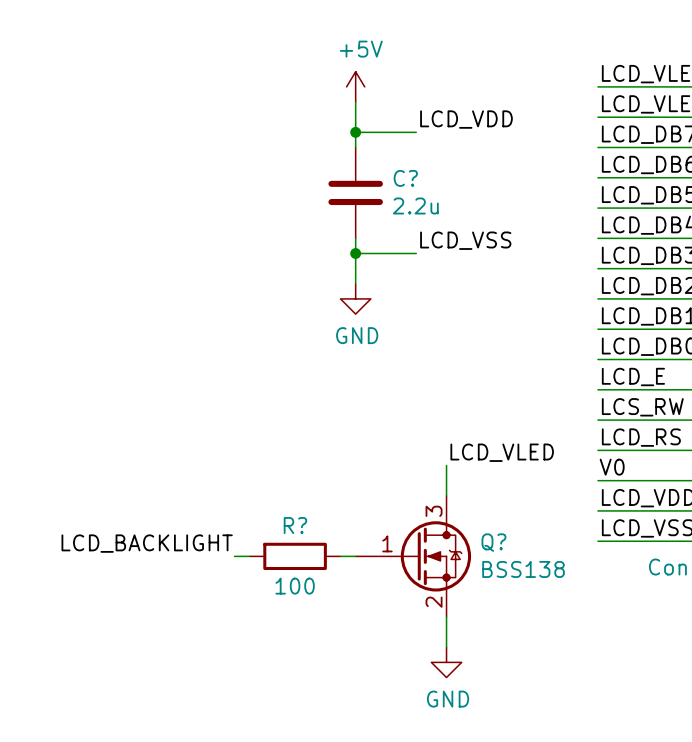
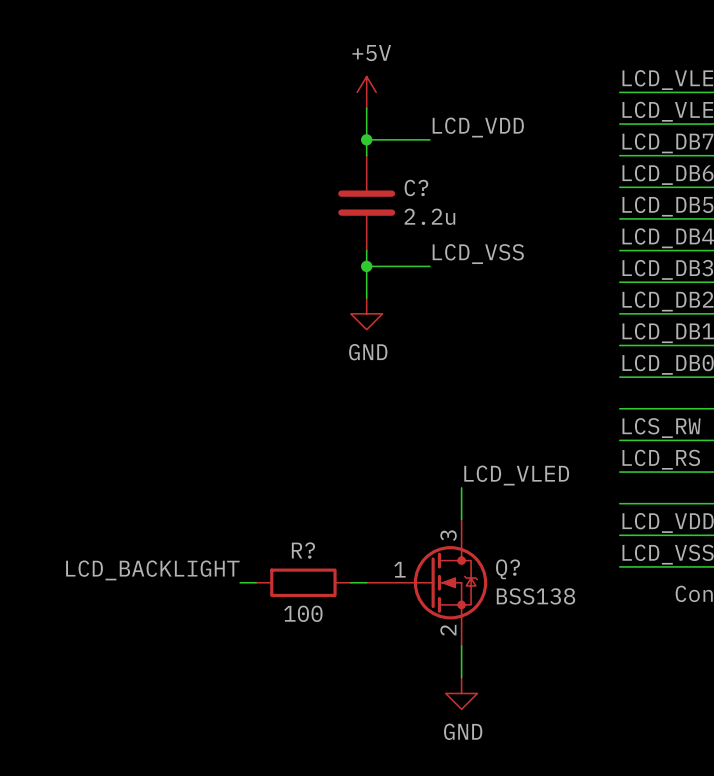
label: LCD_E (633, 377) -> none
label: V0 (612, 467) -> none

